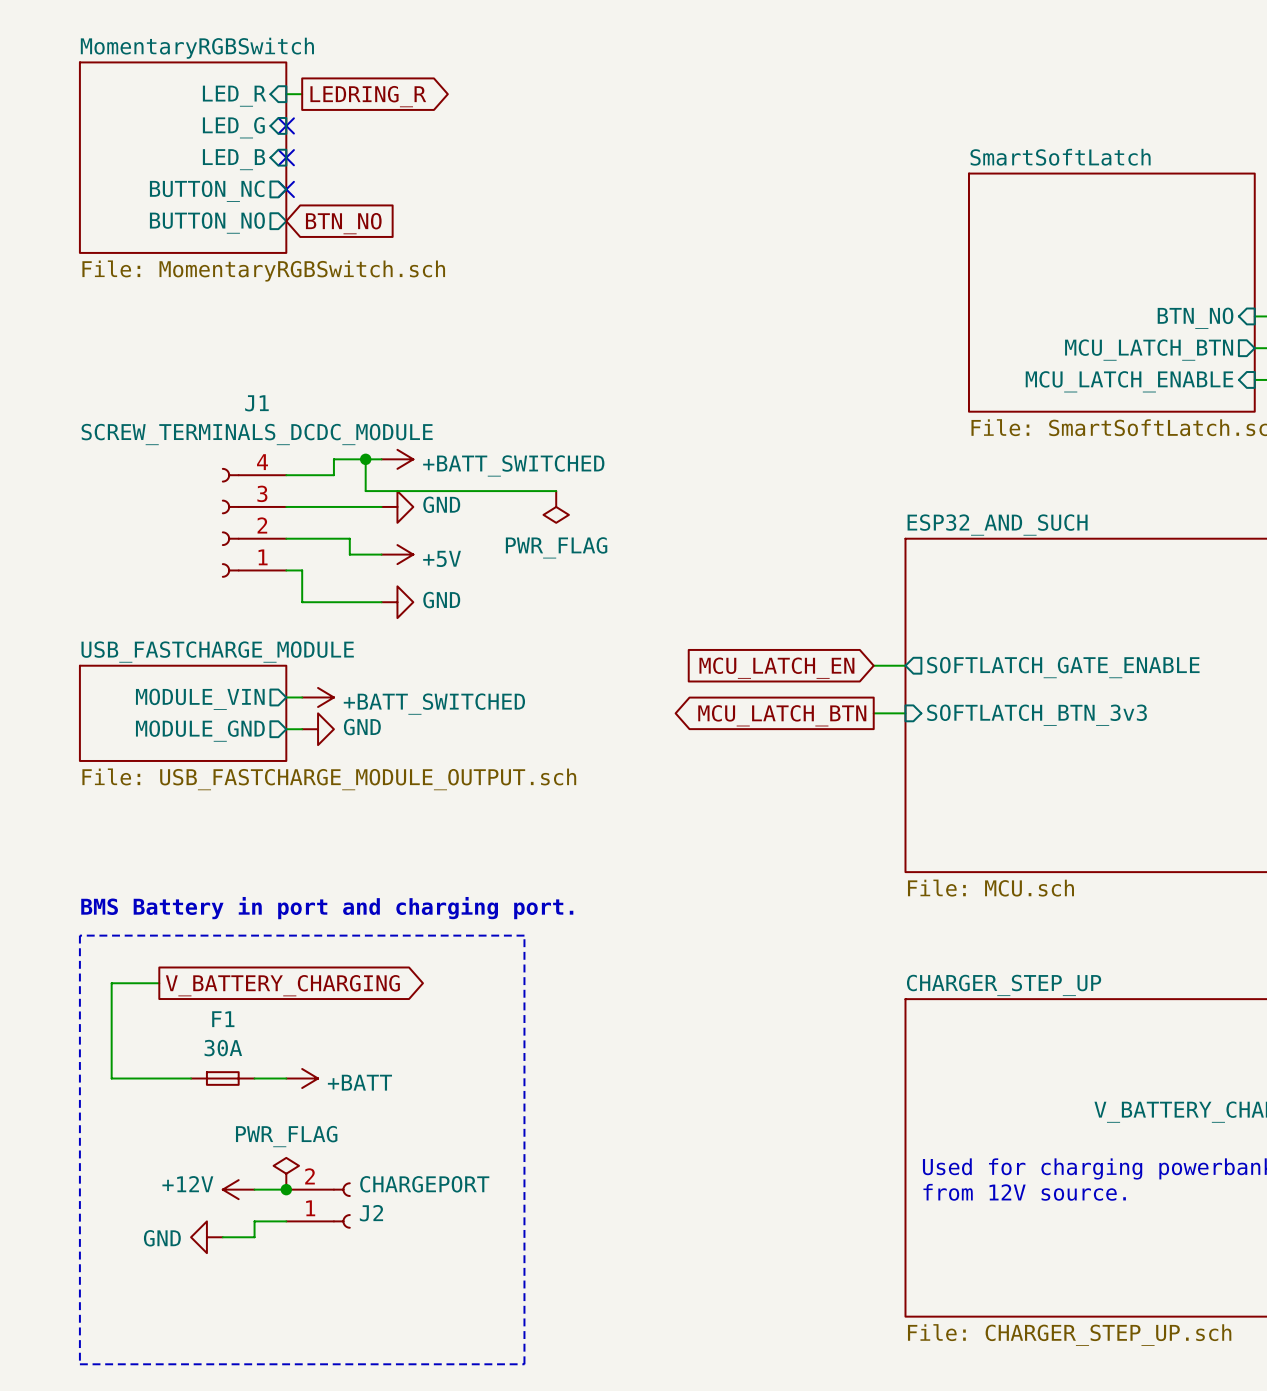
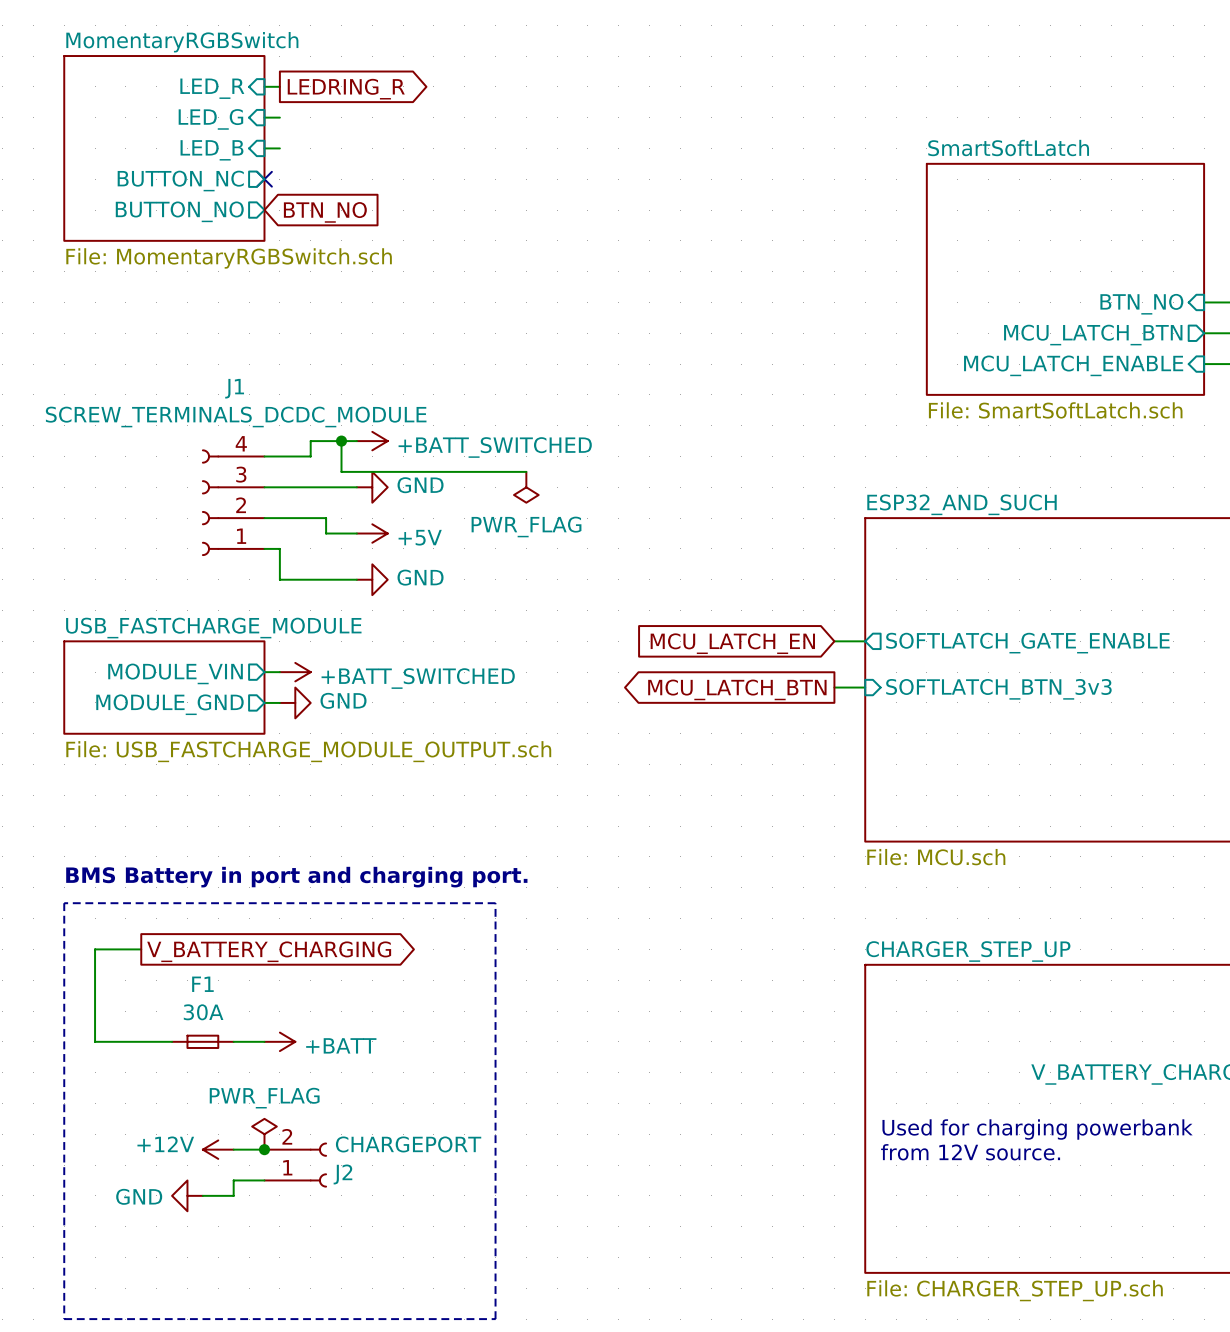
wire: none -> (264, 117) (279, 117)
no-connect mark: (286, 125) -> none
wire: none -> (264, 148) (279, 148)
no-connect mark: (286, 157) -> none

